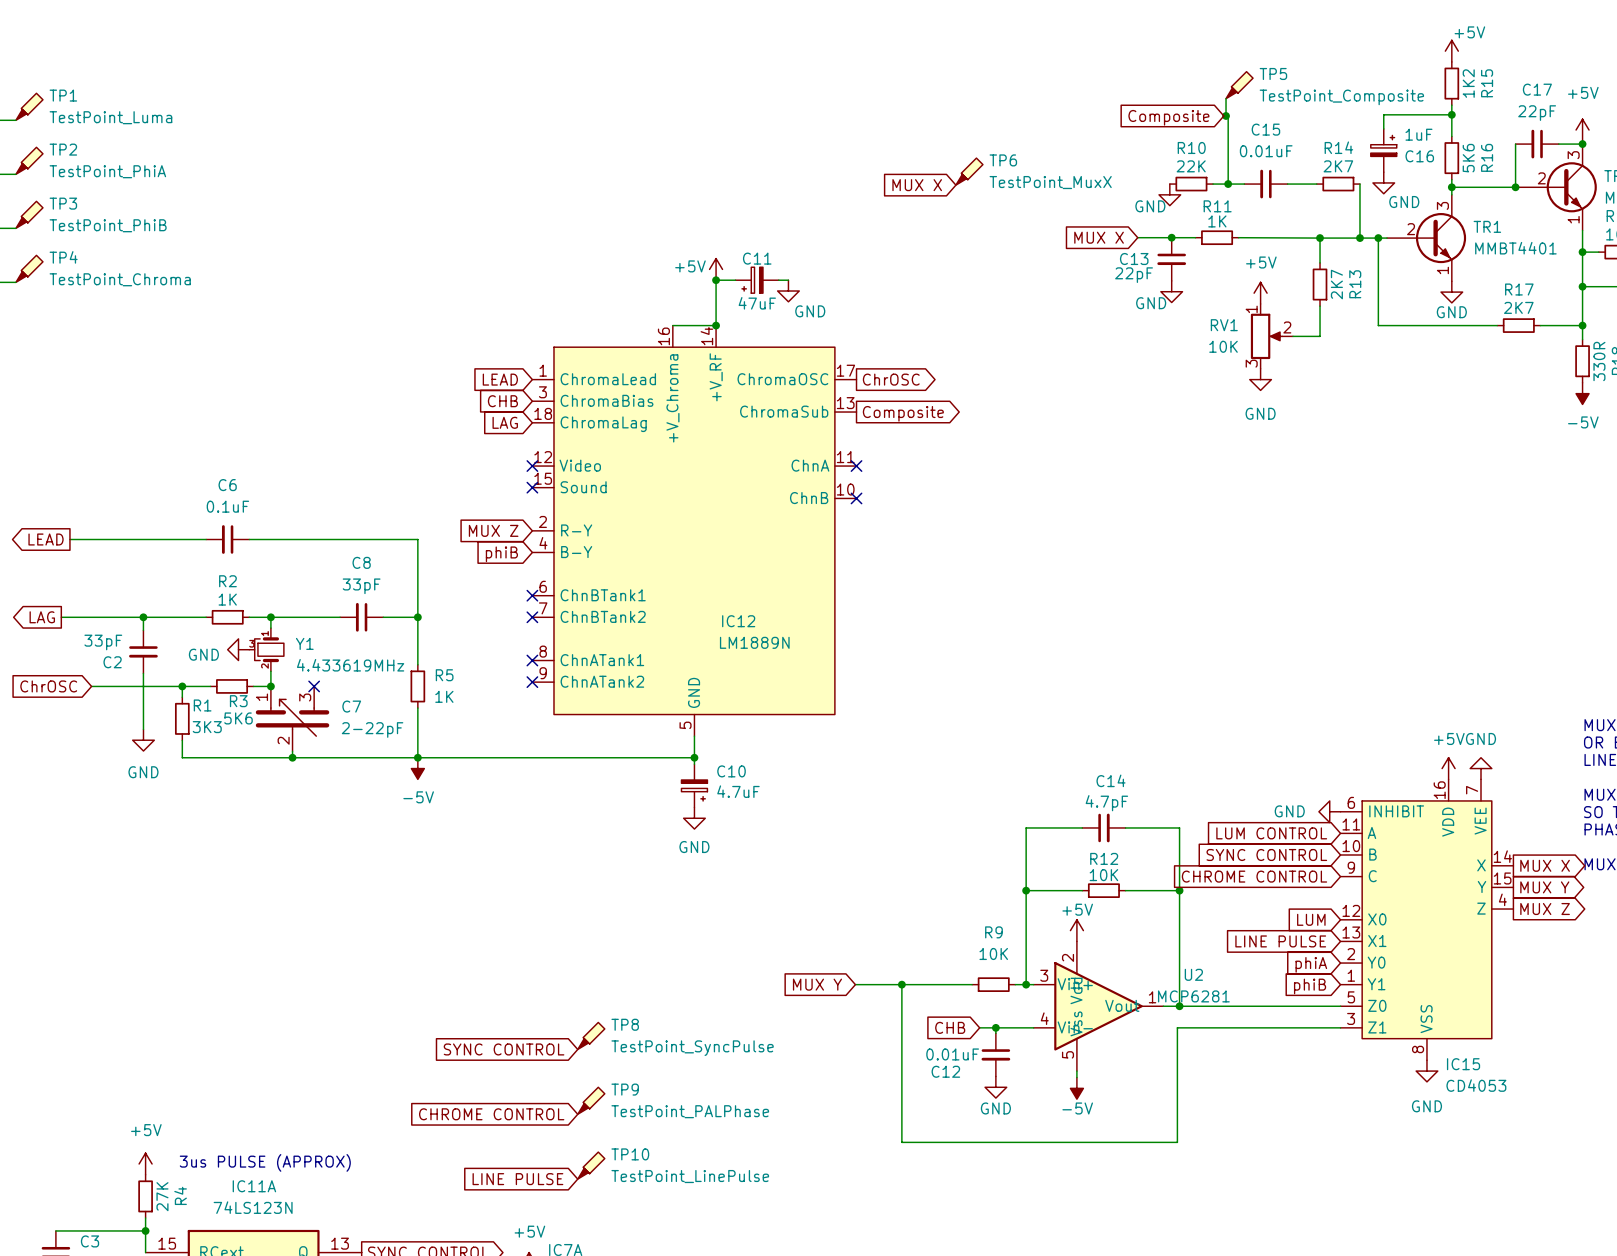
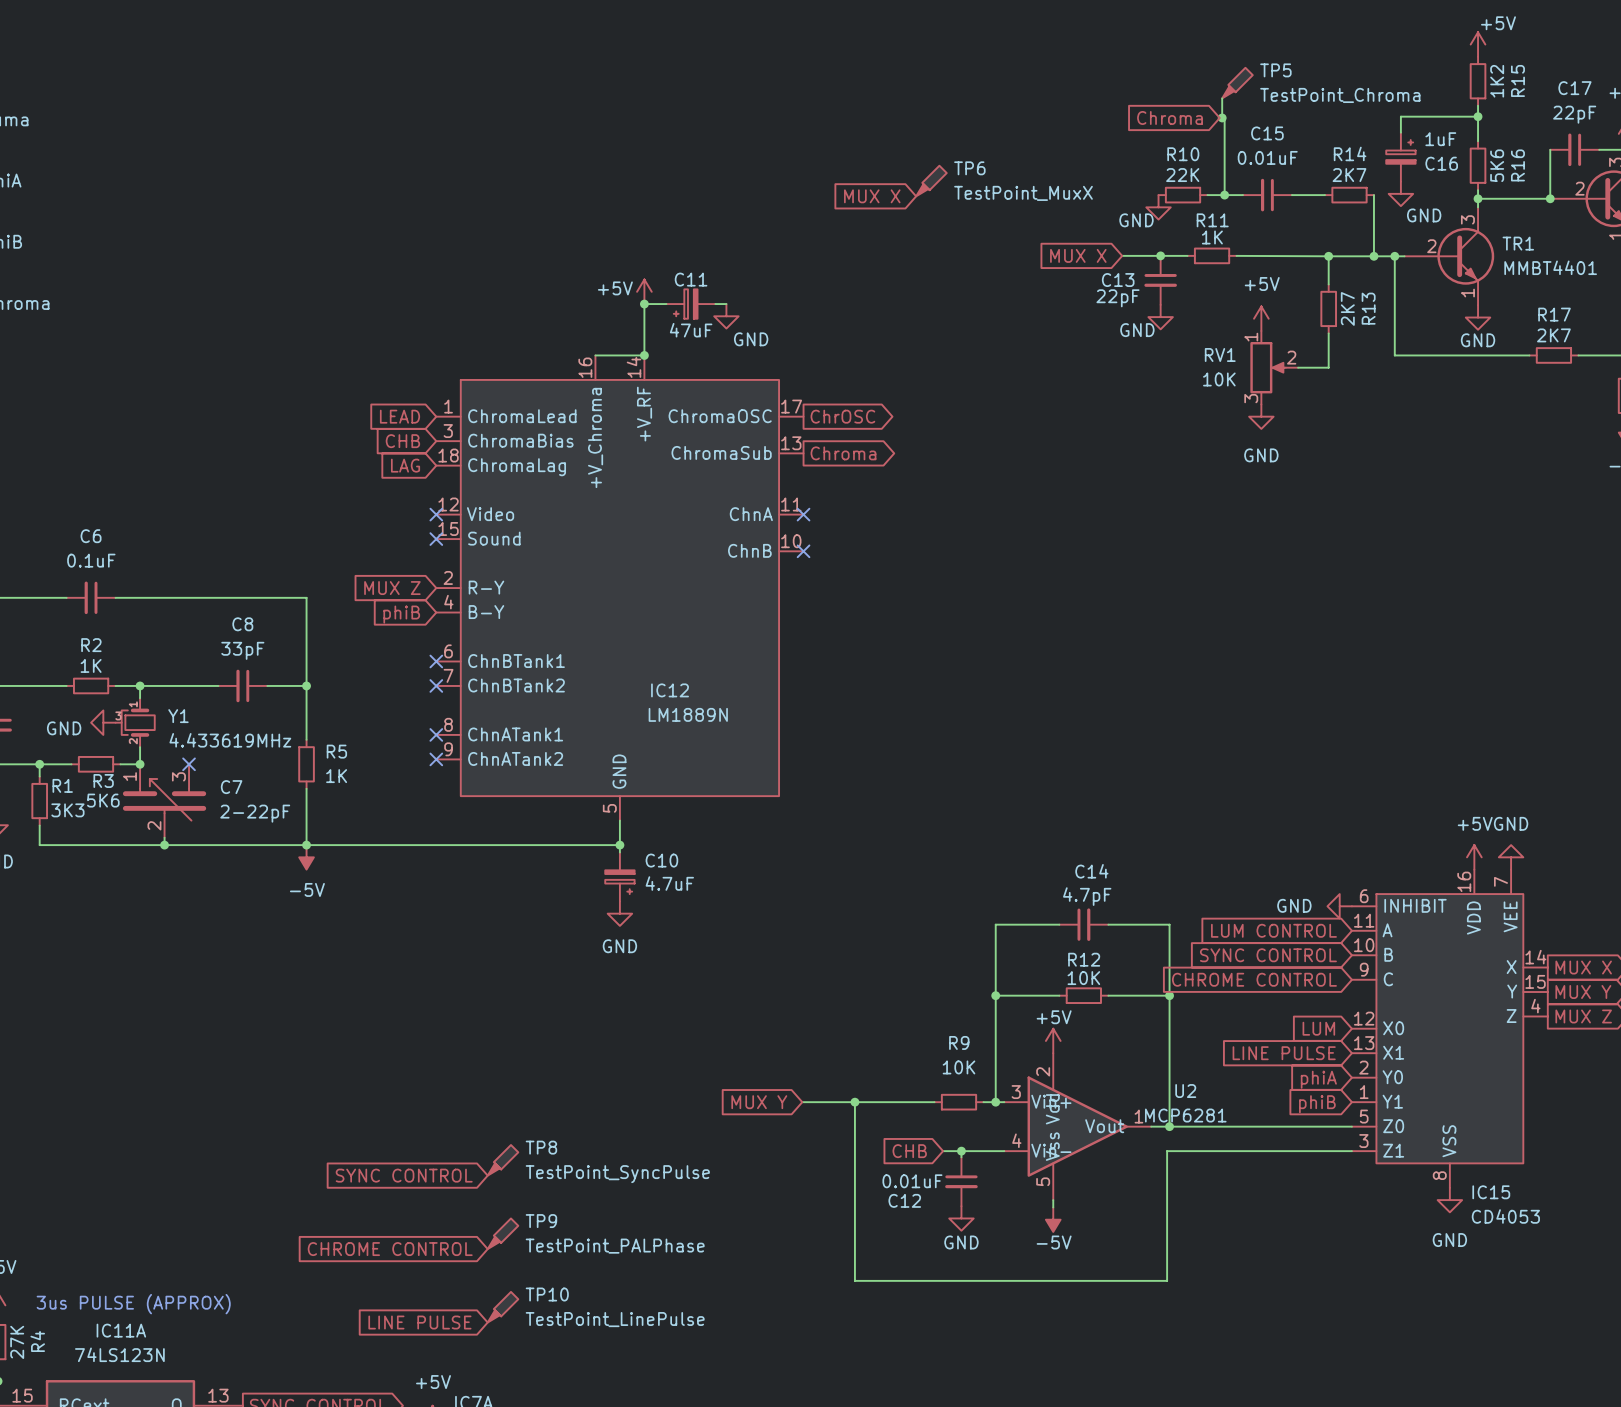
TP5 value: TestPoint_Composite (1341, 97) -> TestPoint_Chroma (1340, 95)
global label: Composite (1168, 117) -> Chroma (1170, 117)
global label: Composite (903, 413) -> Chroma (843, 453)

